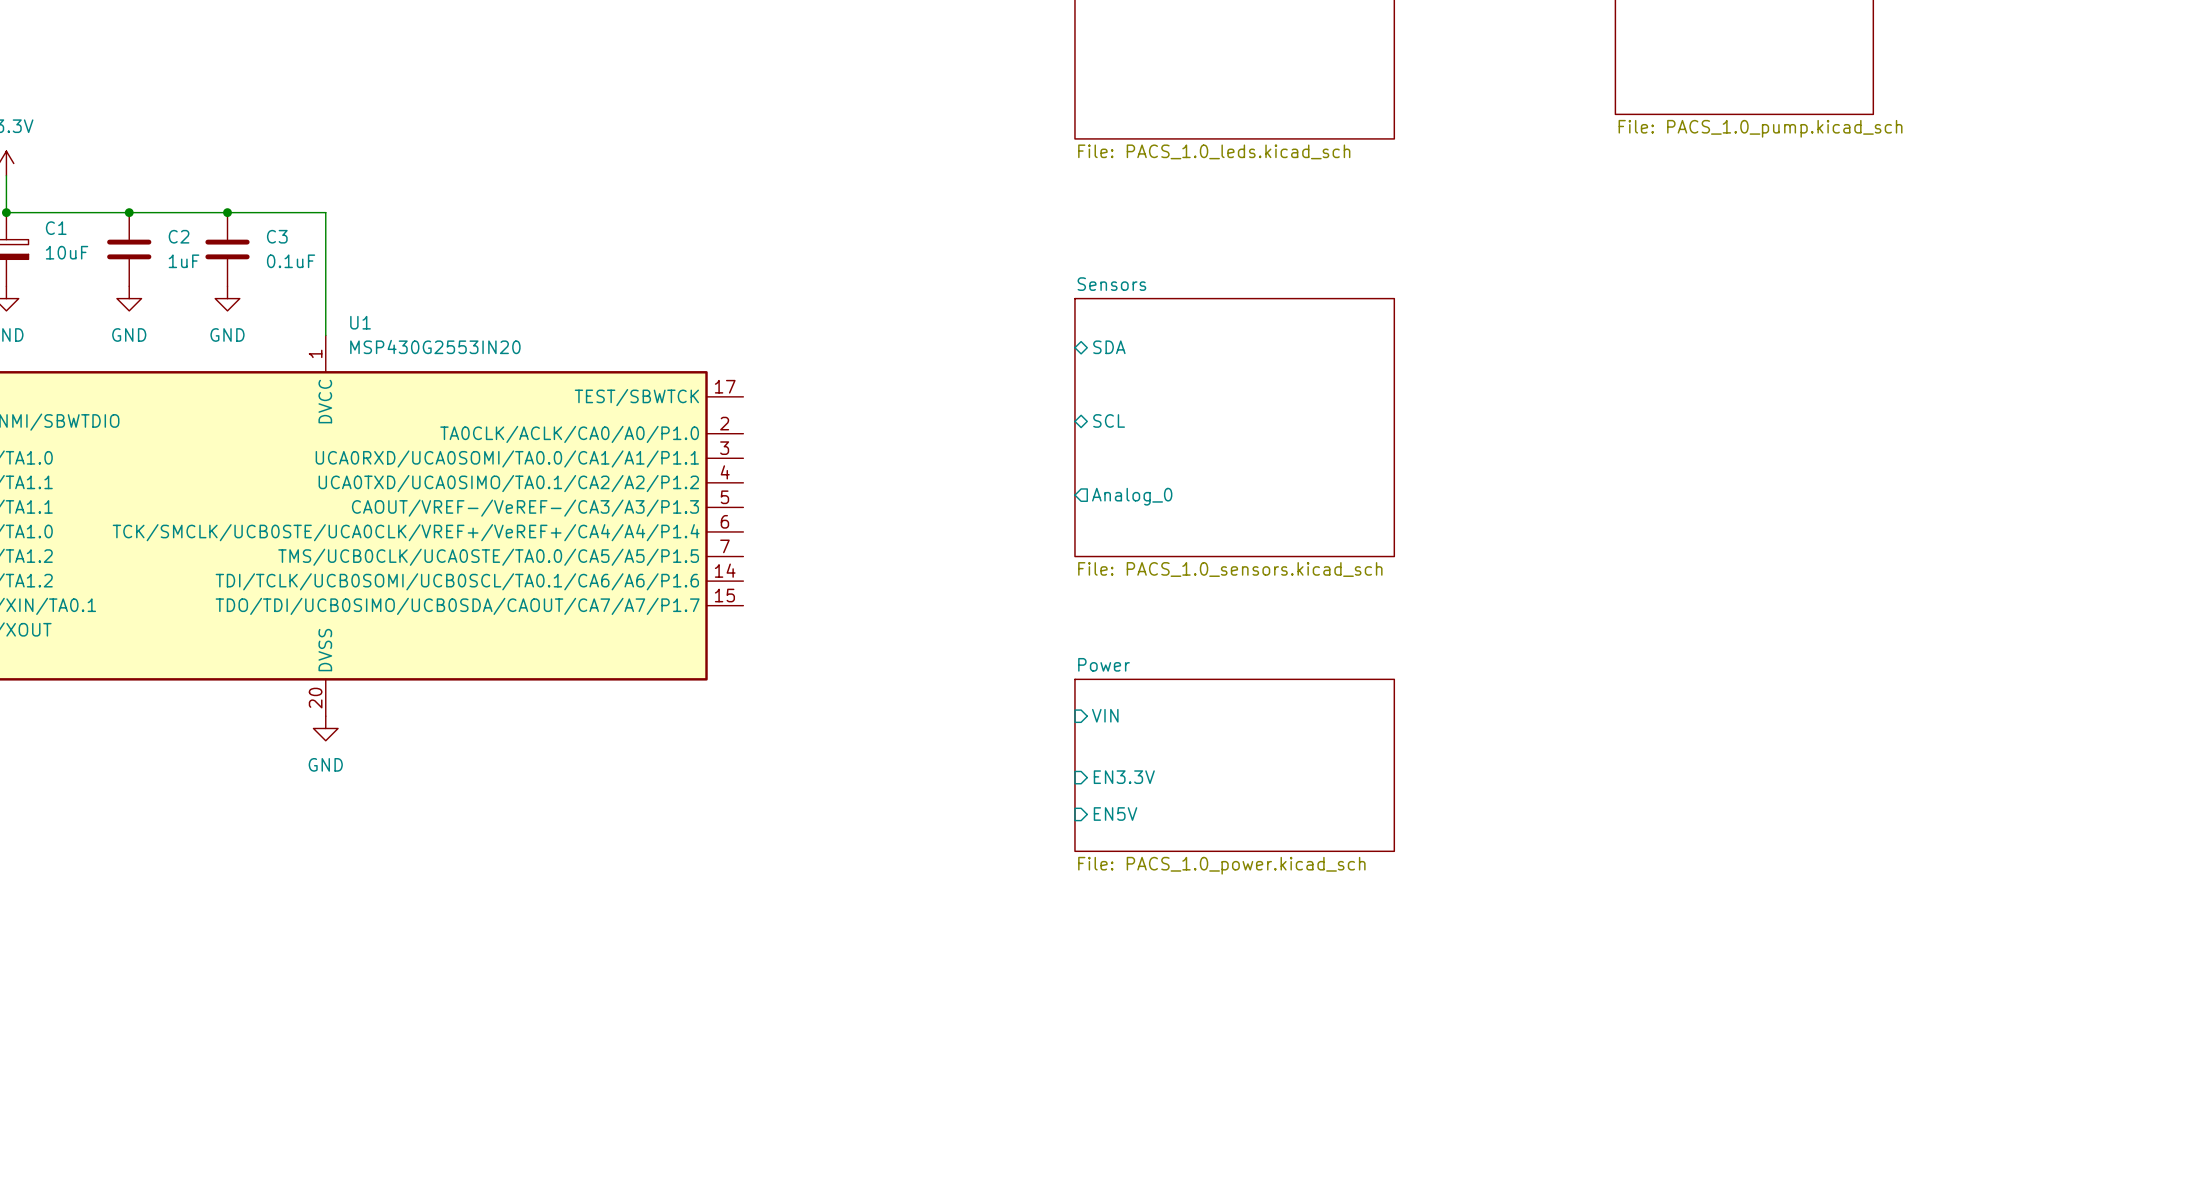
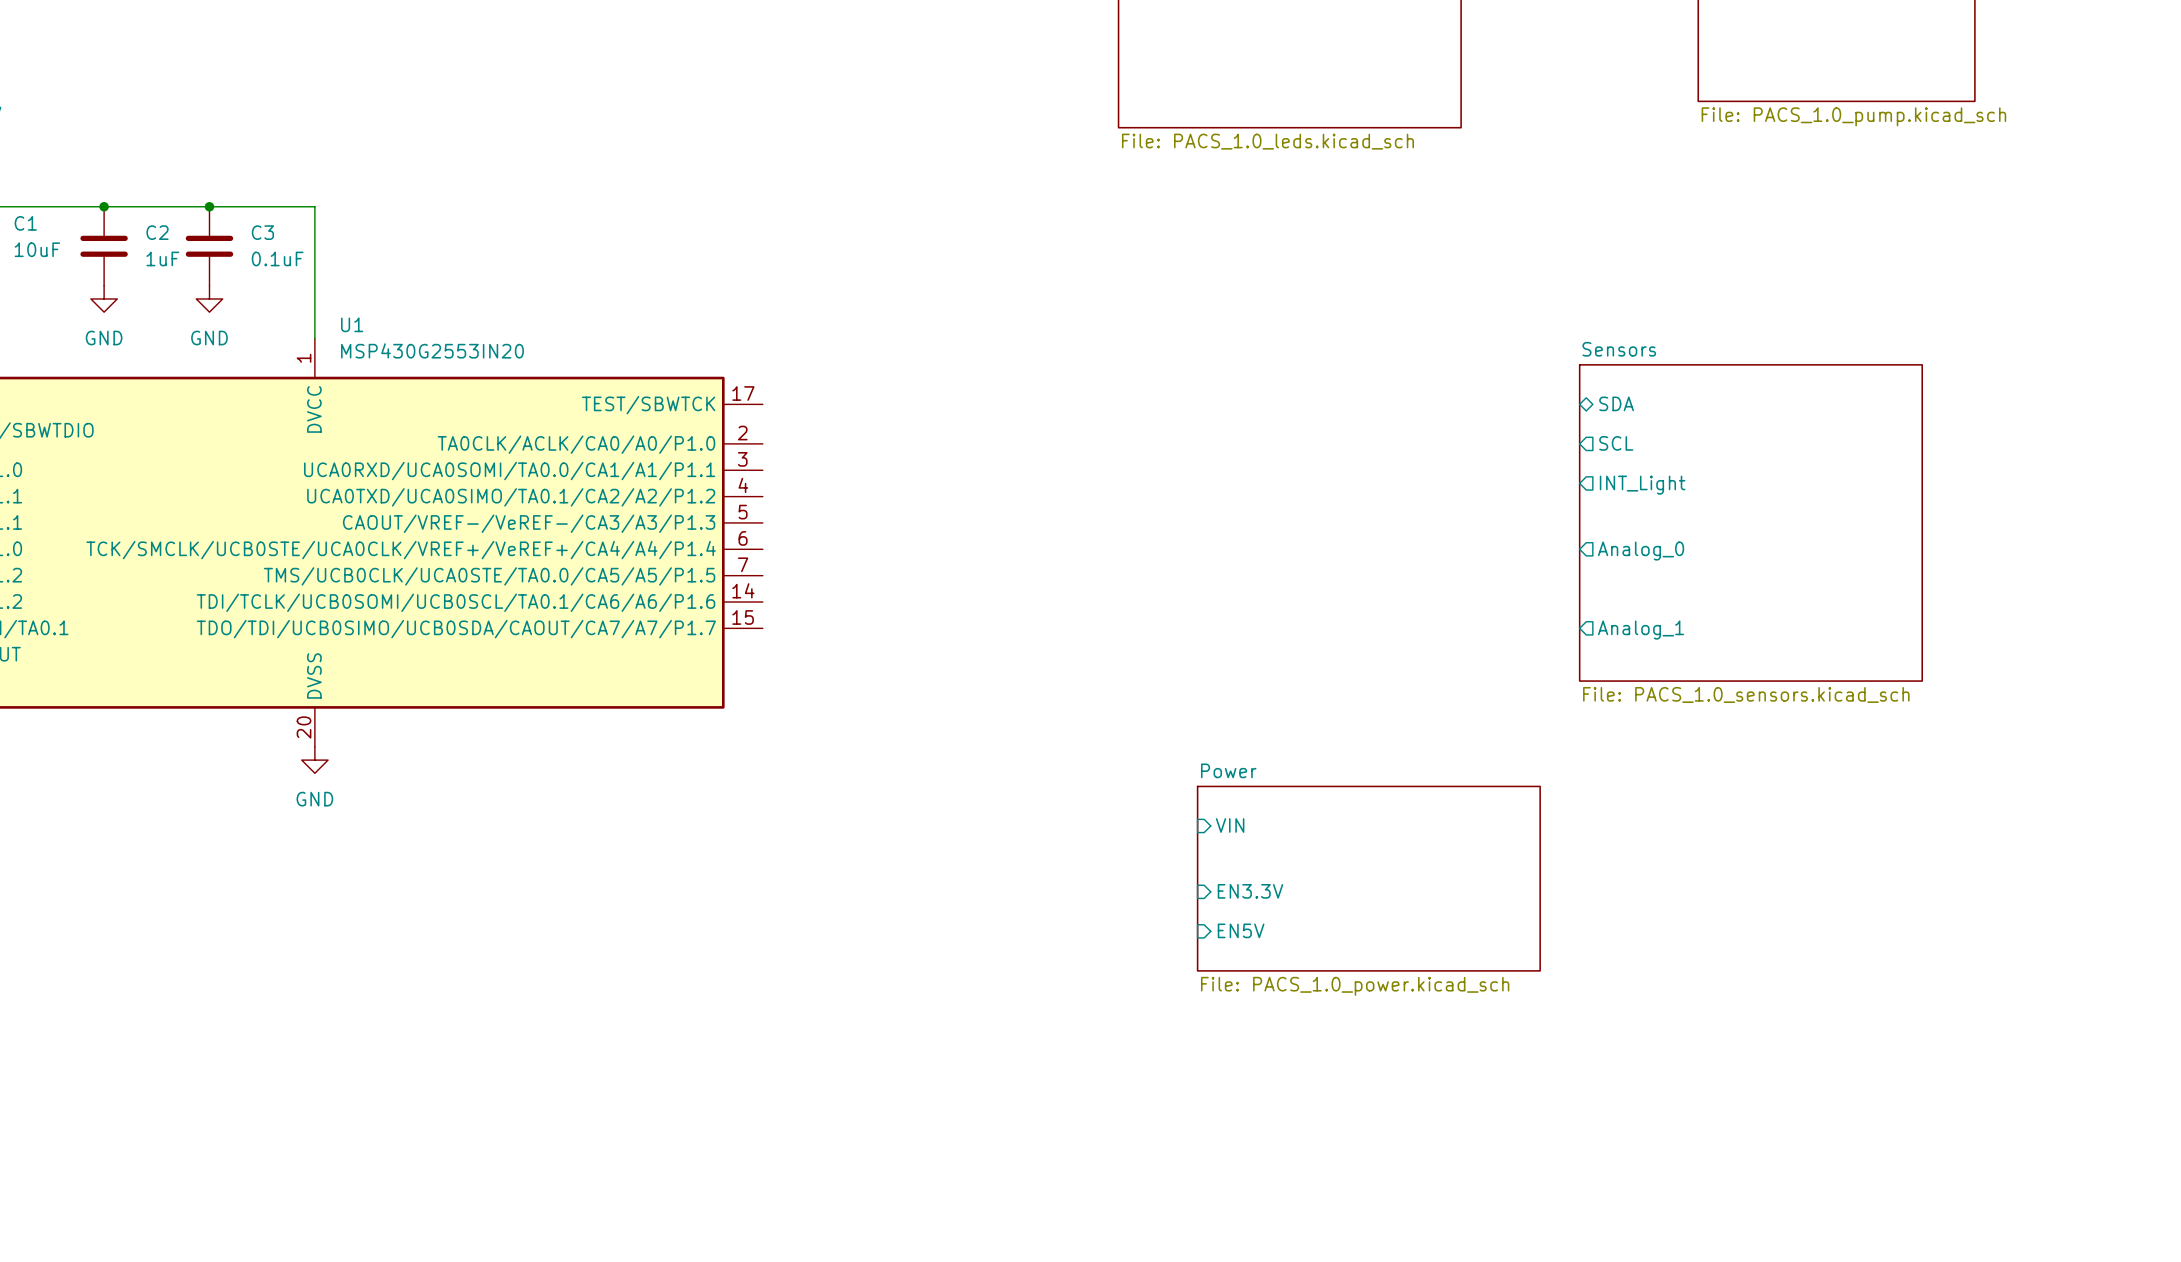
sheet pin: SDA (1109, 347) -> none
sheet pin: none -> SDA (1616, 403)
sheet pin: SCL (1109, 420) -> none
sheet Sensors: File: PACS_1.0_sensors.kicad_sch (1234, 427) -> none
sheet pin: none -> SCL (1616, 443)
sheet pin: none -> INT_Light (1642, 485)
sheet pin: Analog_0 (1132, 496) -> none
sheet Sensors: none -> File: PACS_1.0_sensors.kicad_sch (1750, 522)
sheet pin: none -> Analog_0 (1641, 551)
sheet pin: none -> Analog_1 (1641, 630)
sheet pin position: VIN (1105, 715) -> VIN (1230, 825)
sheet Power position: (1234, 765) -> (1368, 878)
sheet pin position: EN3.3V (1124, 777) -> EN3.3V (1250, 891)
sheet pin position: EN5V (1115, 814) -> EN5V (1241, 930)

